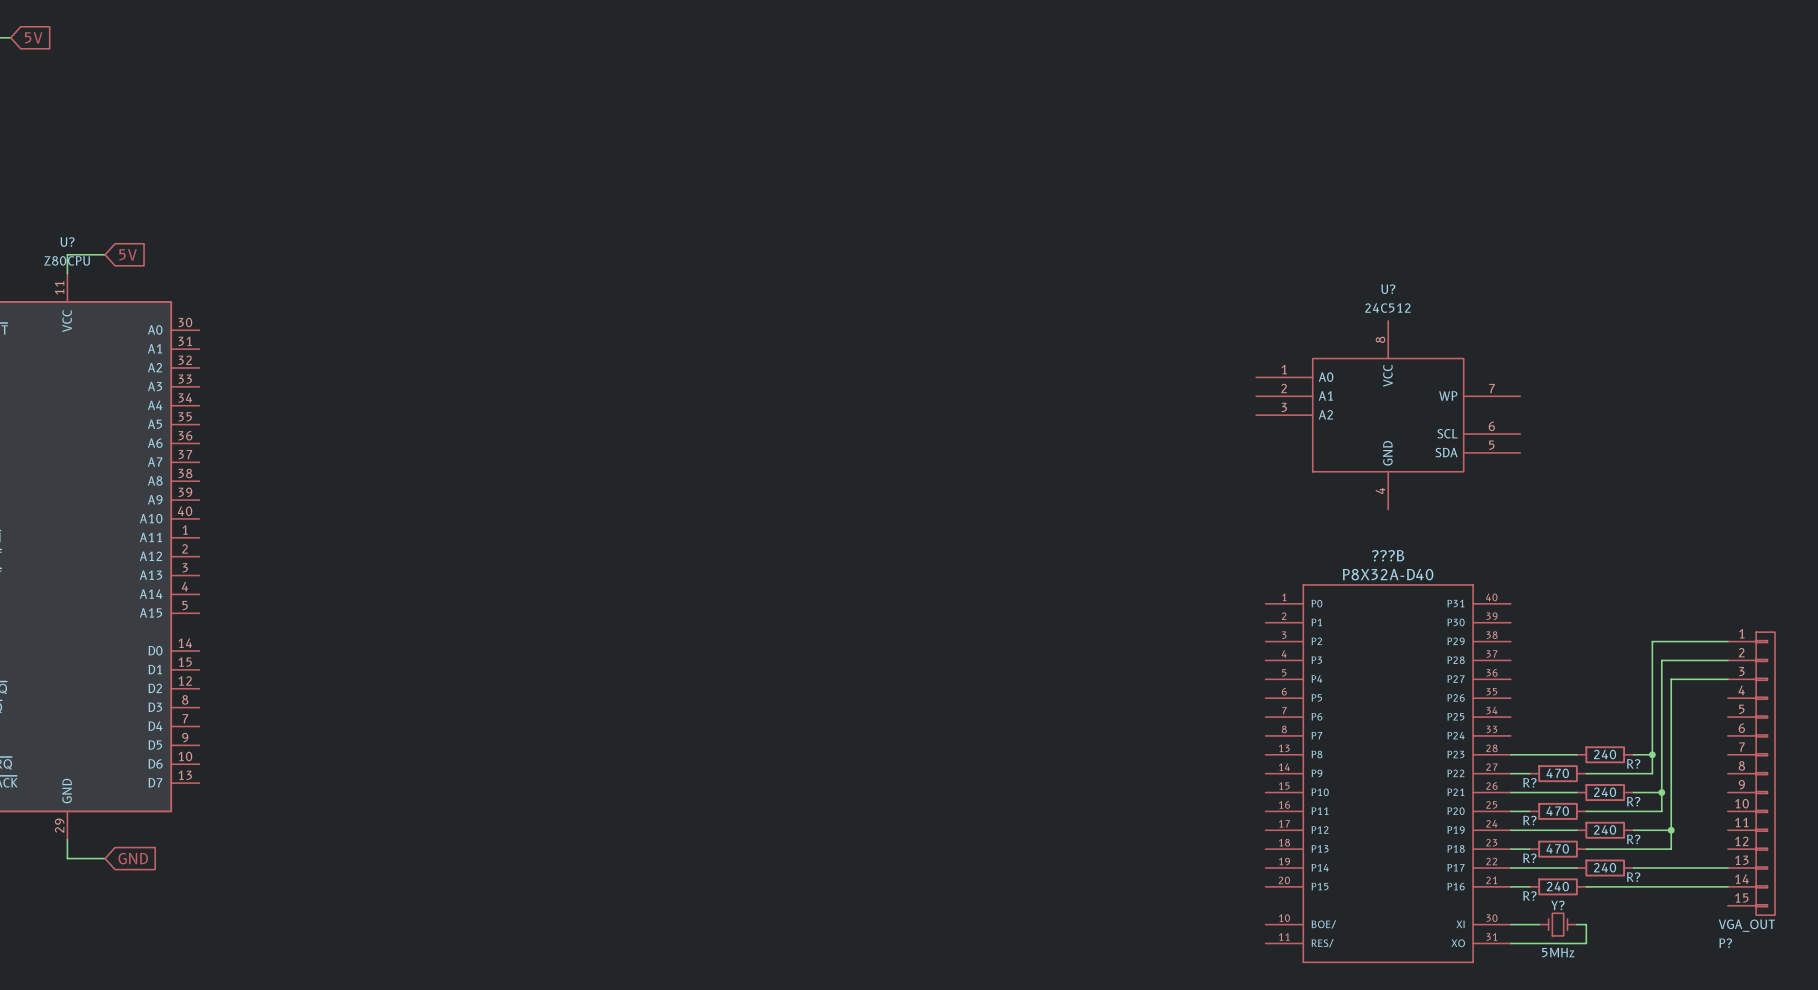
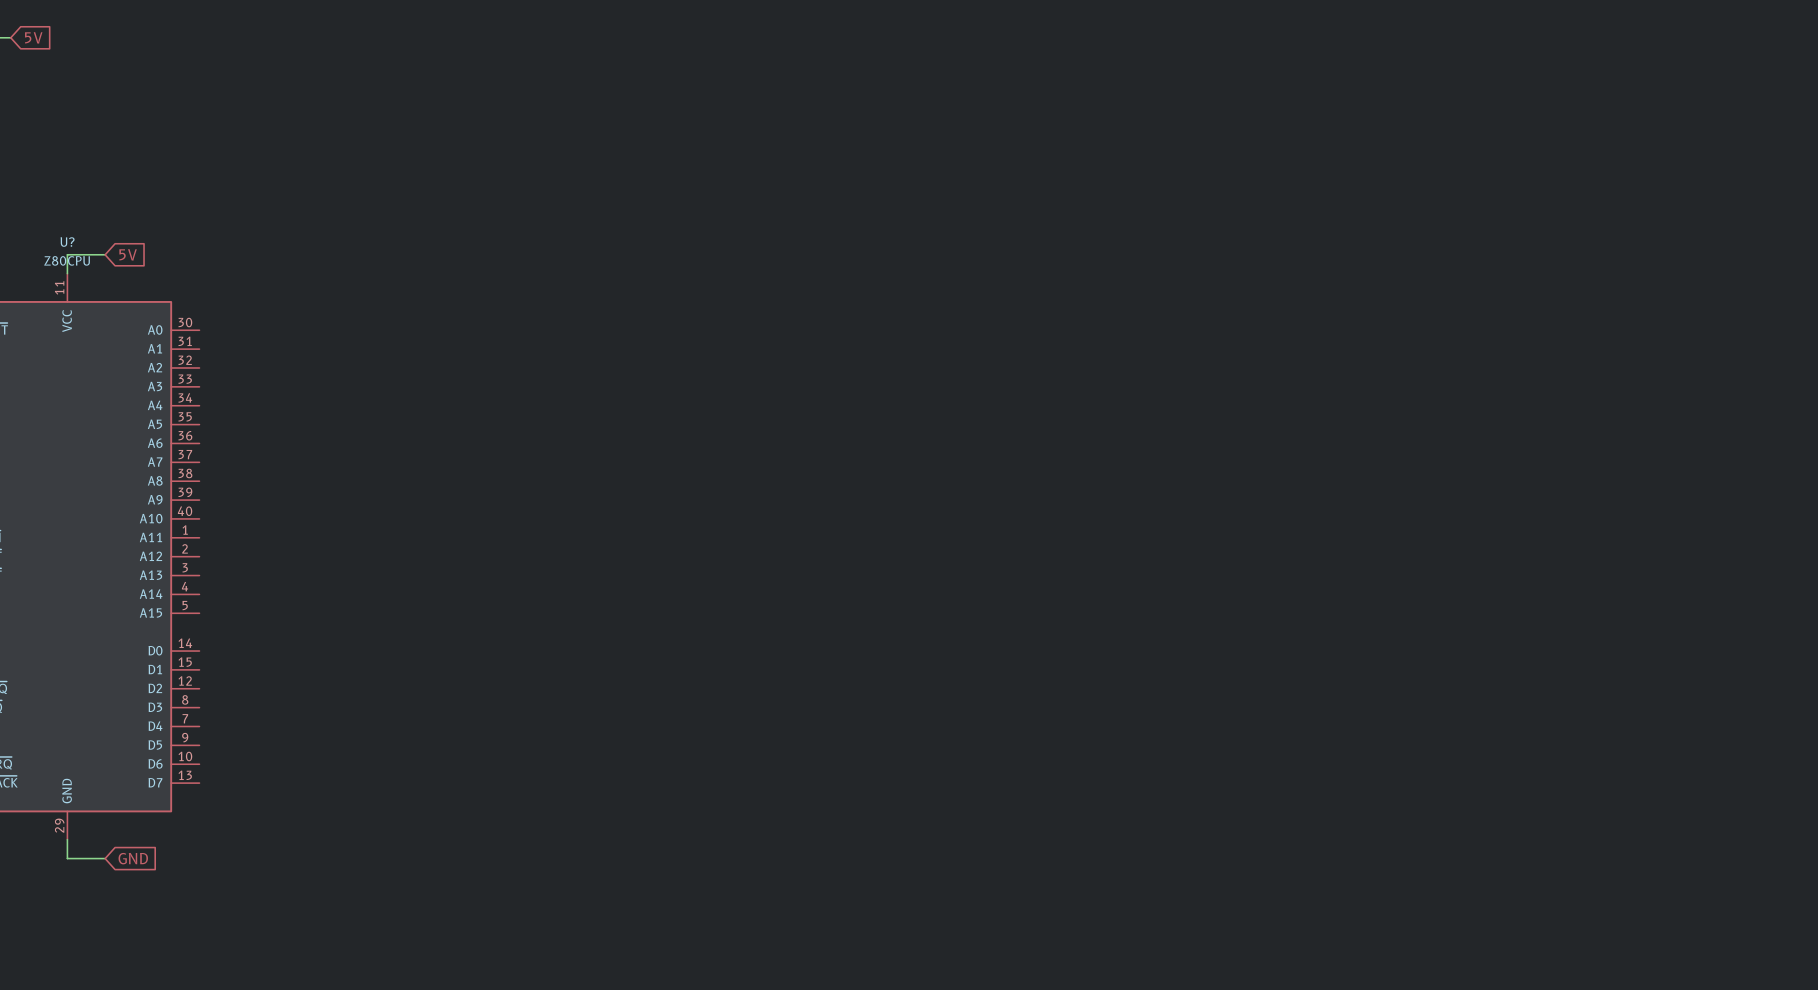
U?: 24C512 (1388, 415) -> none
wire: (1727, 641) (1652, 641) (1652, 773) (1586, 773) -> none
wire: (1727, 660) (1661, 660) (1661, 811) (1586, 811) -> none
wire: (1727, 679) (1671, 679) (1671, 849) (1586, 849) -> none
wire: (1510, 754) (1576, 754) -> none
R?: 240 (1605, 754) -> none
wire: (1633, 754) (1652, 754) -> none
junction: (1652, 754) -> none
???B: P8X32A-D40 (1388, 773) -> none
wire: (1510, 773) (1529, 773) -> none
R?: 470 (1558, 773) -> none
P?: VGA_OUT (1751, 773) -> none
wire: (1510, 792) (1576, 792) -> none
R?: 240 (1605, 792) -> none
wire: (1633, 792) (1661, 792) -> none
junction: (1661, 792) -> none
wire: (1510, 811) (1529, 811) -> none
R?: 470 (1558, 811) -> none
wire: (1510, 830) (1576, 830) -> none
R?: 240 (1605, 830) -> none
wire: (1633, 830) (1671, 830) -> none
junction: (1671, 830) -> none
wire: (1510, 849) (1529, 849) -> none
R?: 470 (1558, 849) -> none
wire: (1510, 868) (1576, 868) -> none
R?: 240 (1605, 868) -> none
wire: (1633, 868) (1727, 868) -> none
wire: (1510, 886) (1529, 886) -> none
R?: 240 (1558, 886) -> none
wire: (1586, 886) (1727, 886) -> none
wire: (1510, 924) (1539, 924) -> none
Y?: 5MHz (1558, 924) -> none
wire: (1576, 924) (1586, 924) (1586, 943) (1510, 943) -> none

